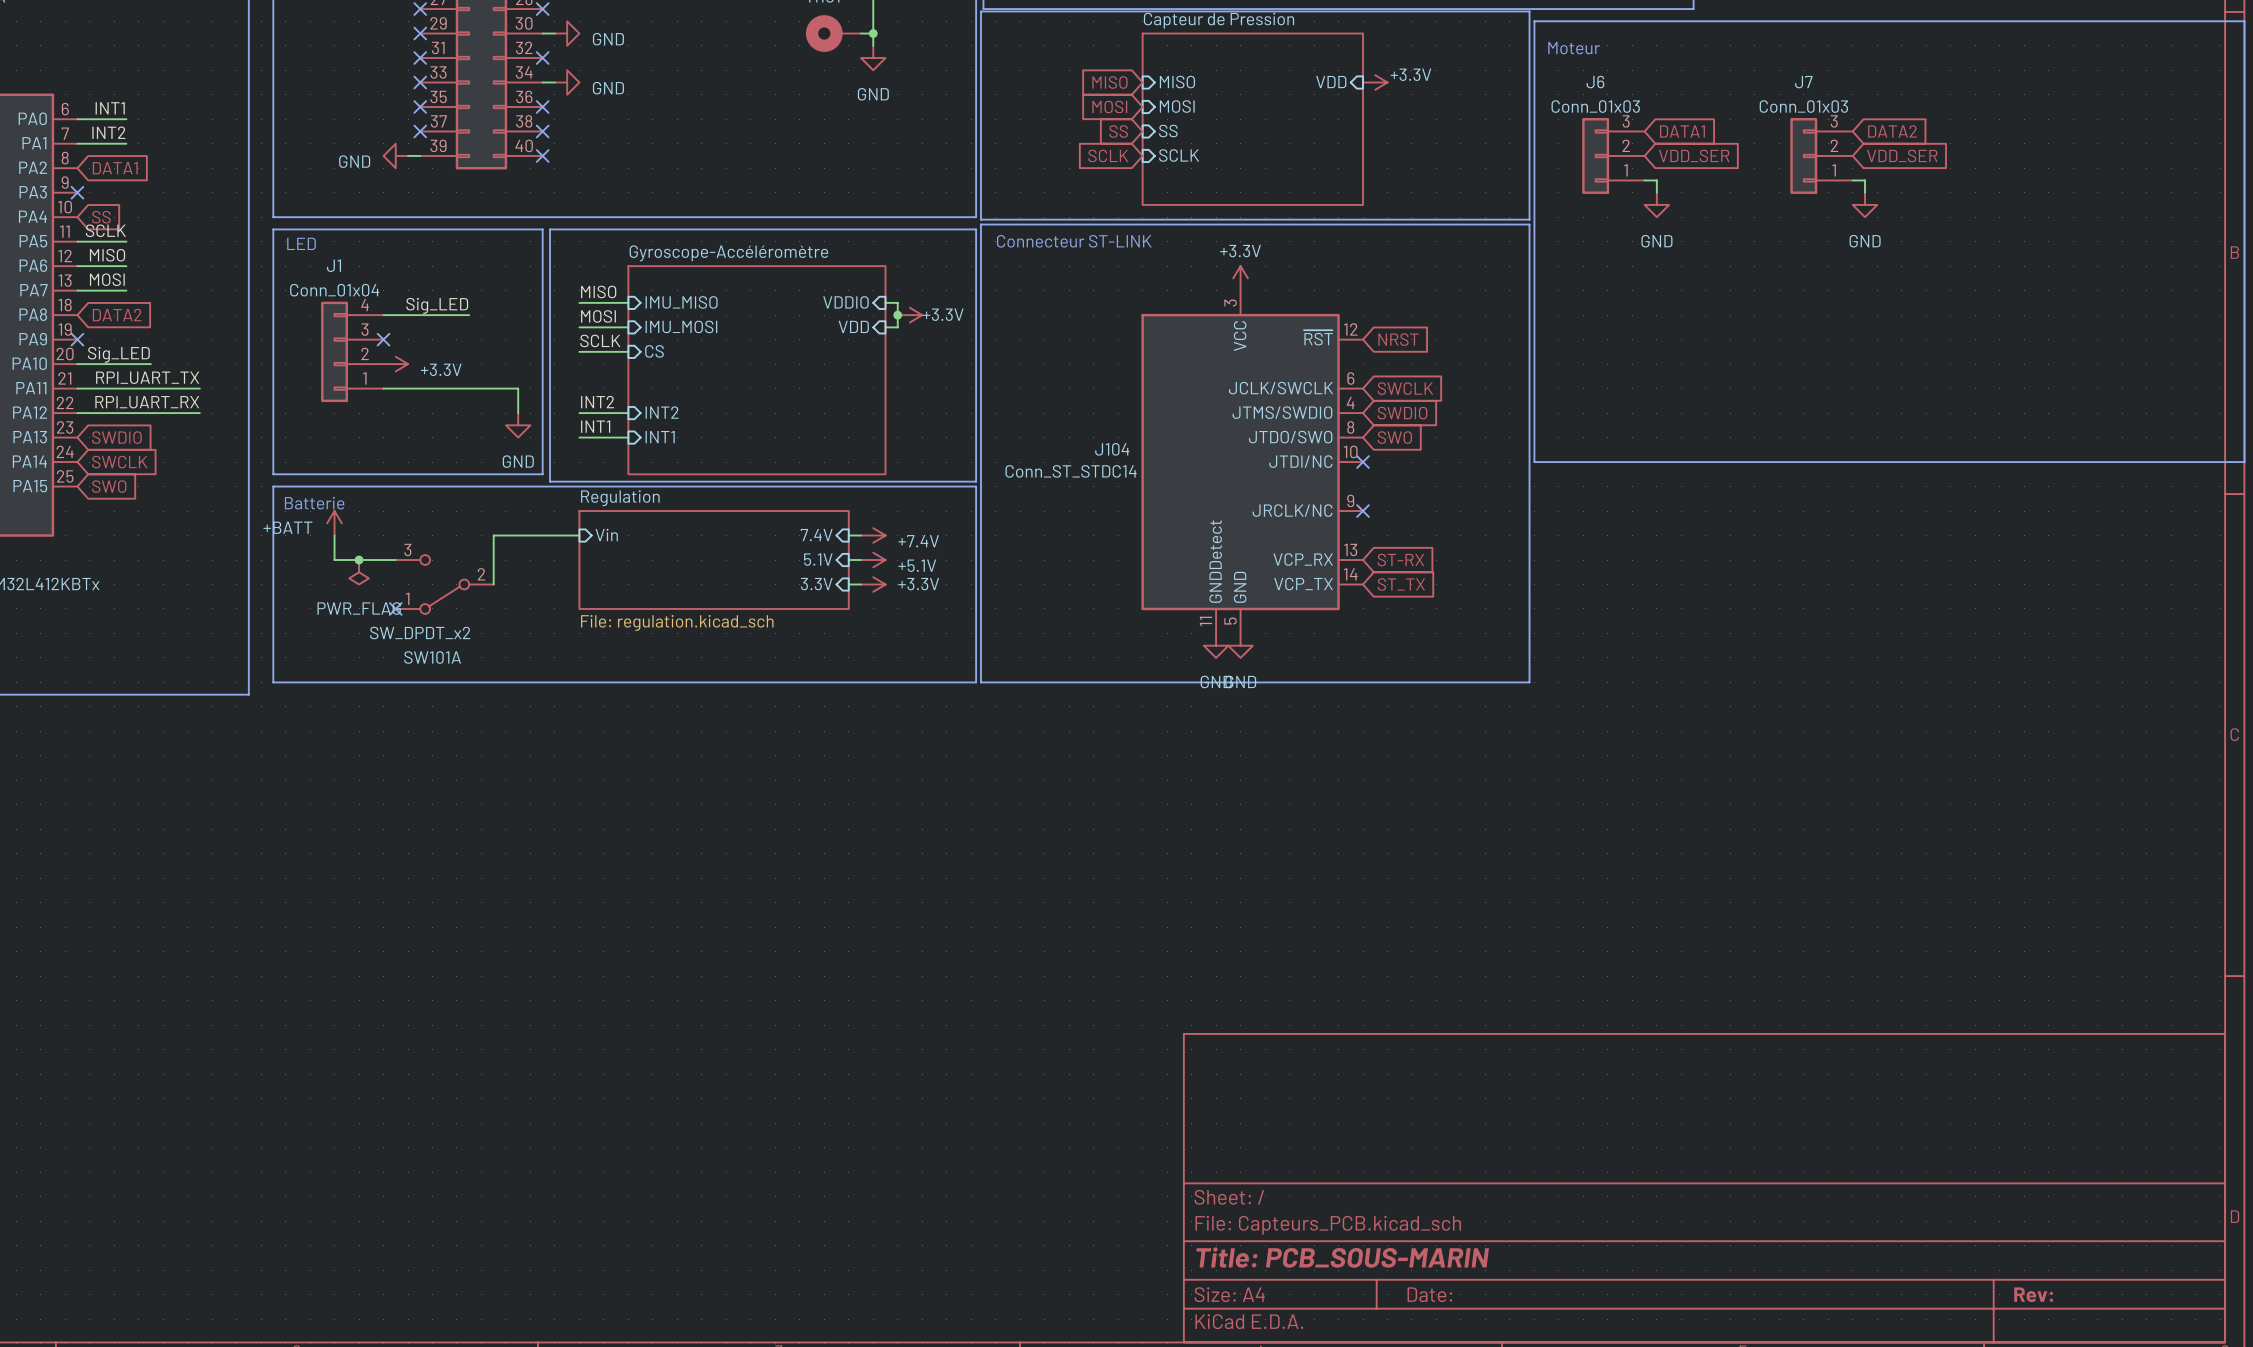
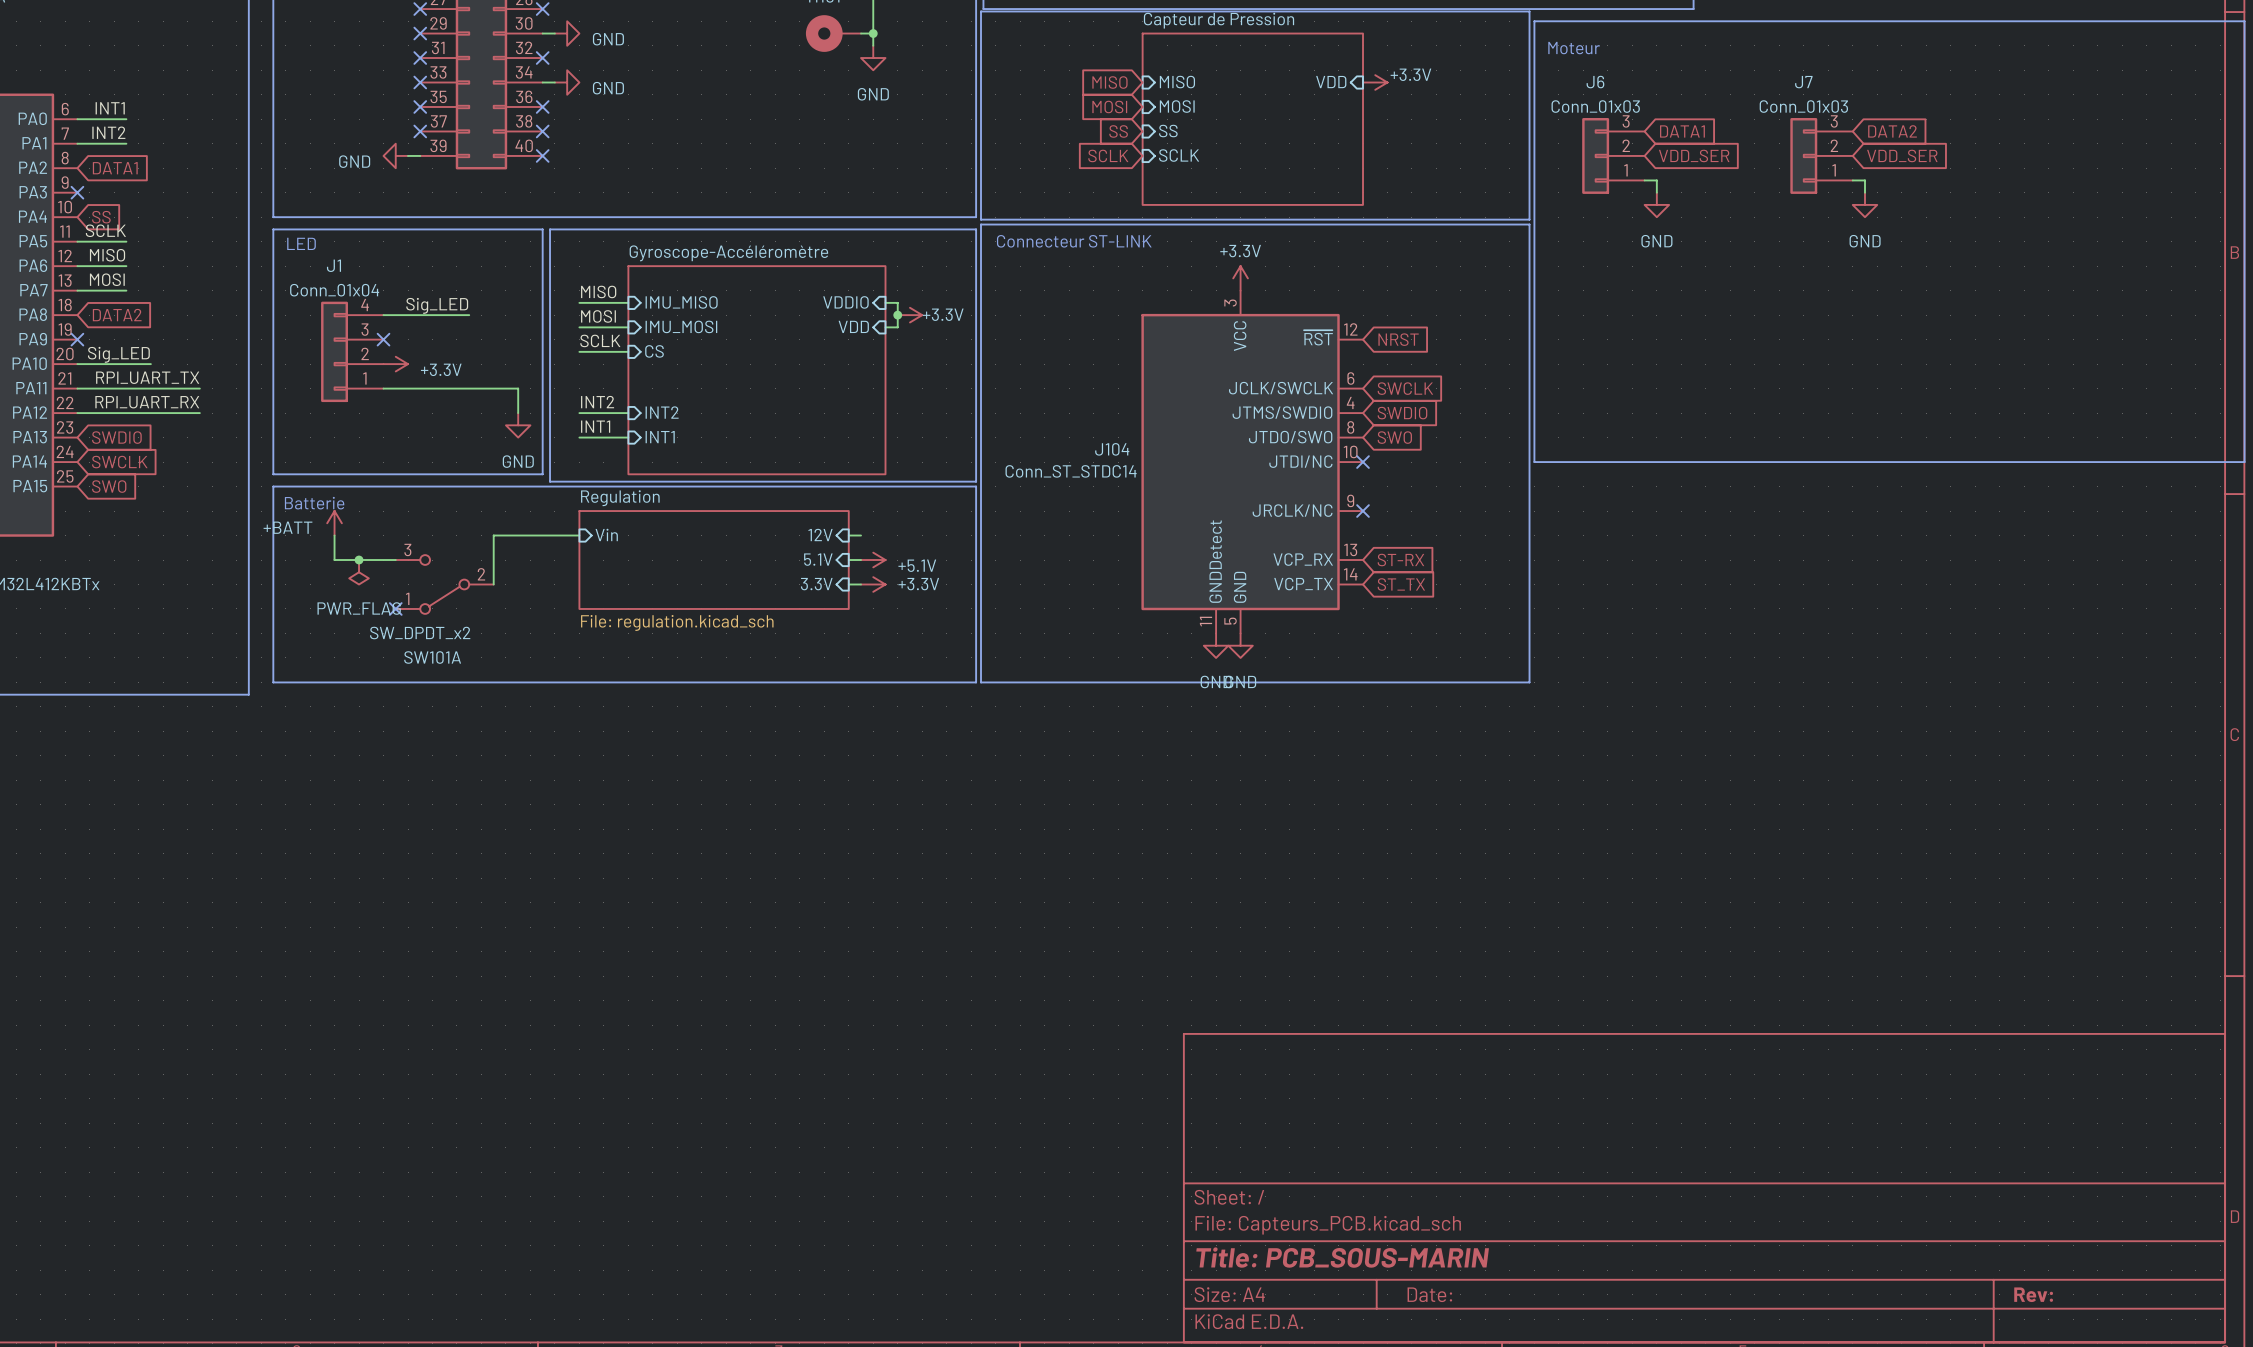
sheet pin: 7.4V (816, 535) -> 12V (820, 534)
power symbol: +7.4V (873, 535) -> none

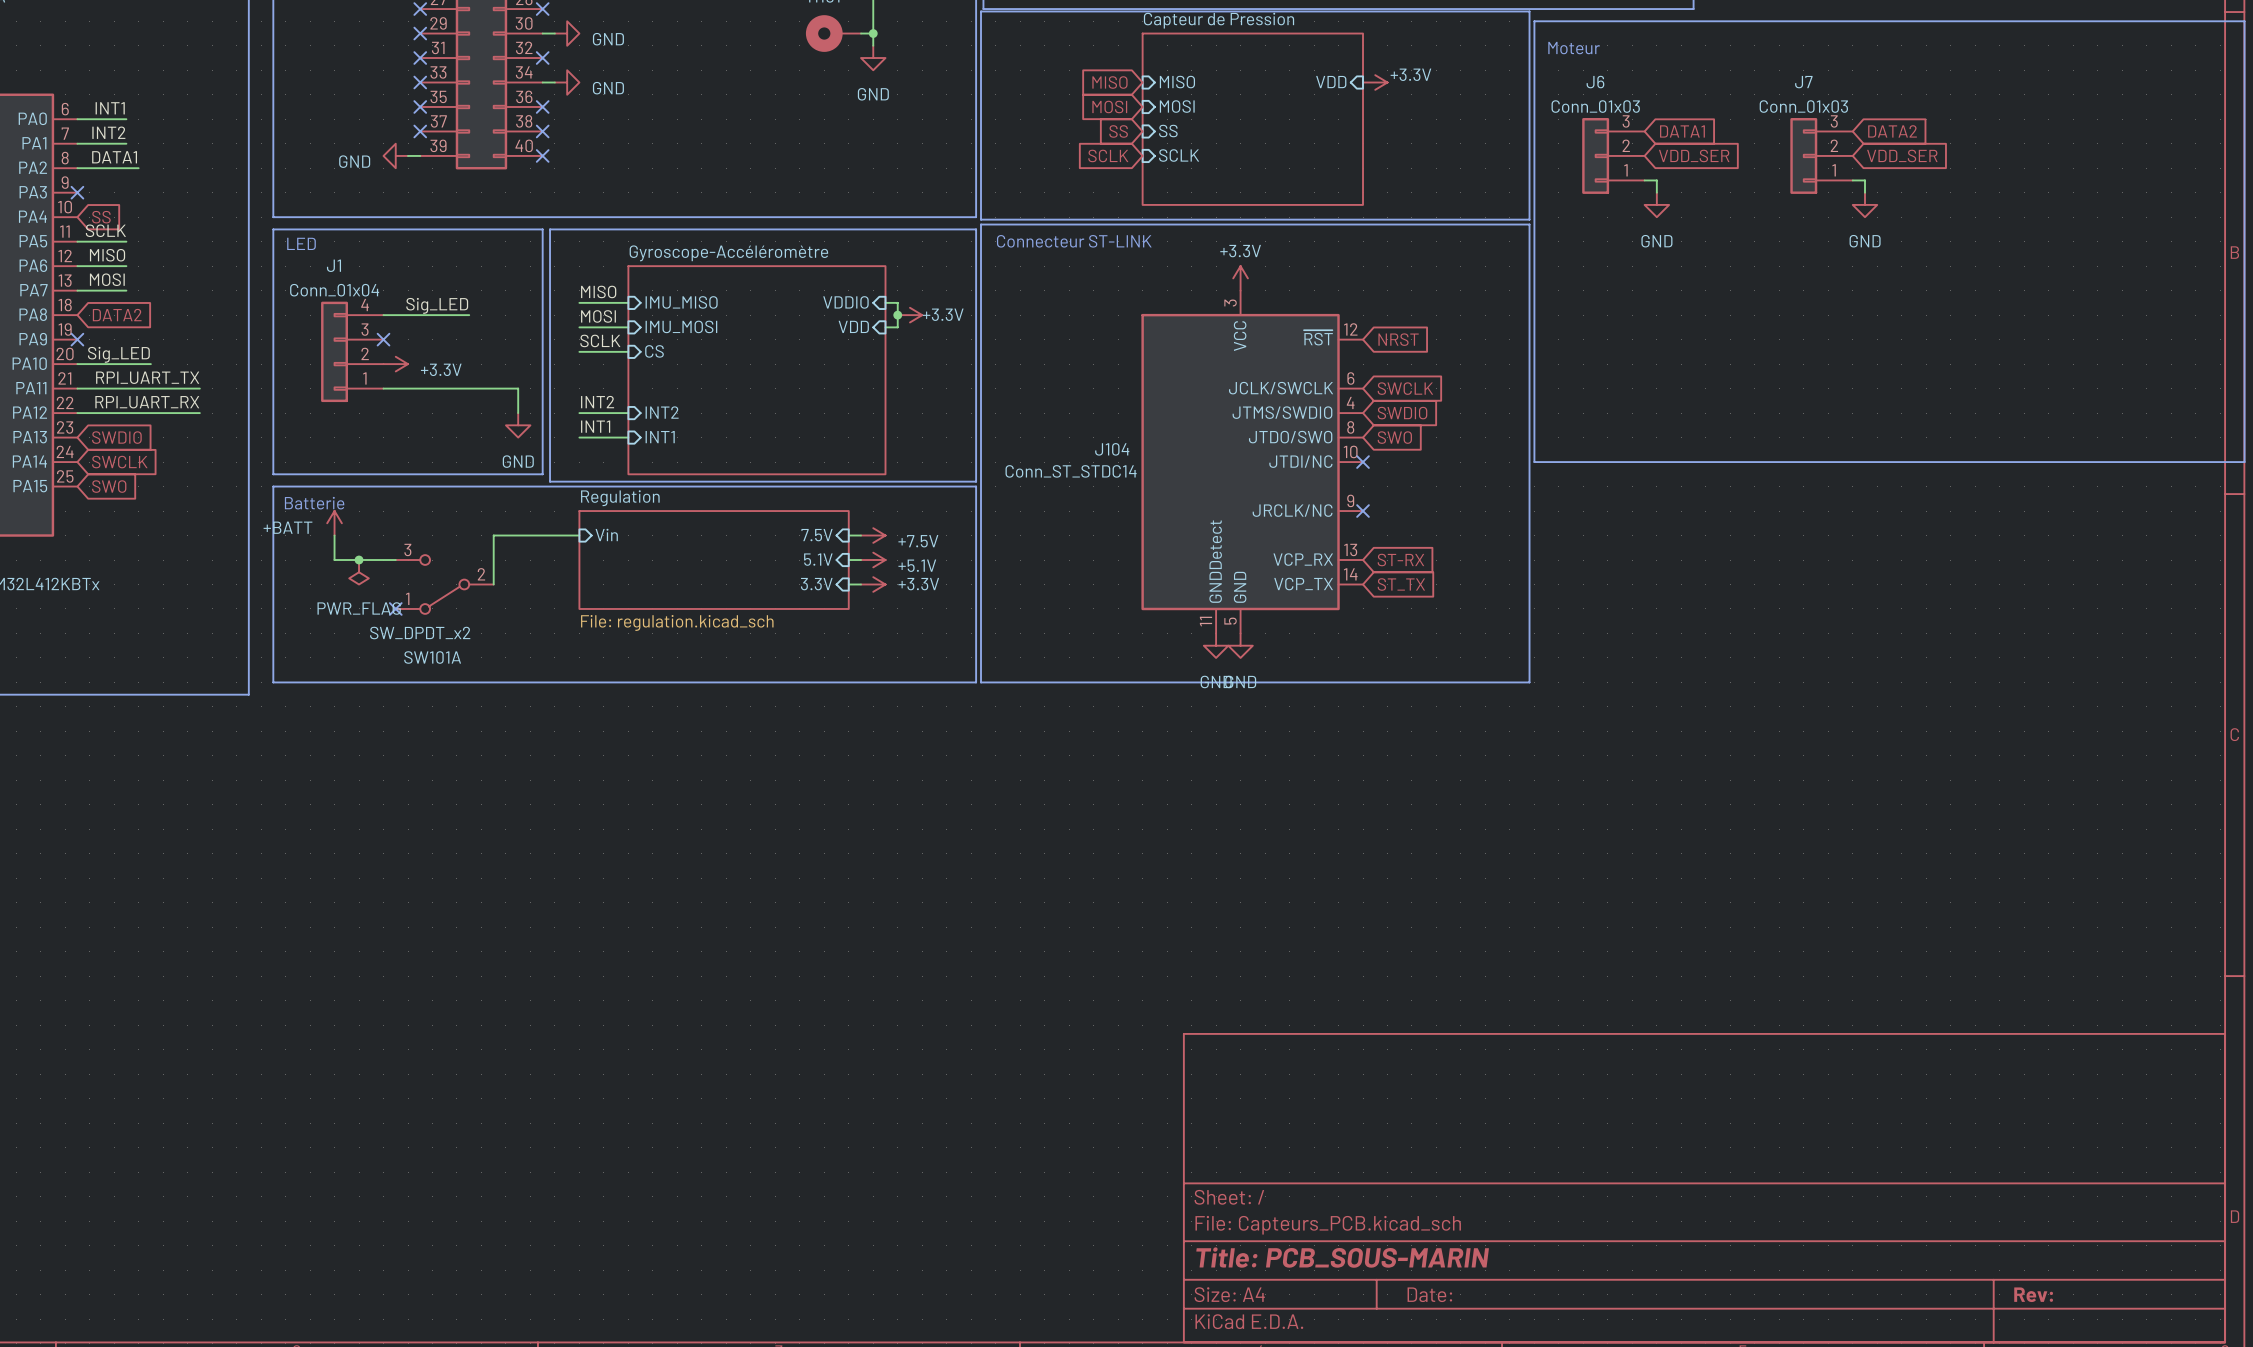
label: none -> DATA1 (114, 157)
wire: none -> (77, 168) (138, 168)
global label: DATA1 (115, 168) -> none
sheet pin: 12V (820, 534) -> 7.5V (817, 535)
power symbol: none -> +7.5V (873, 535)

